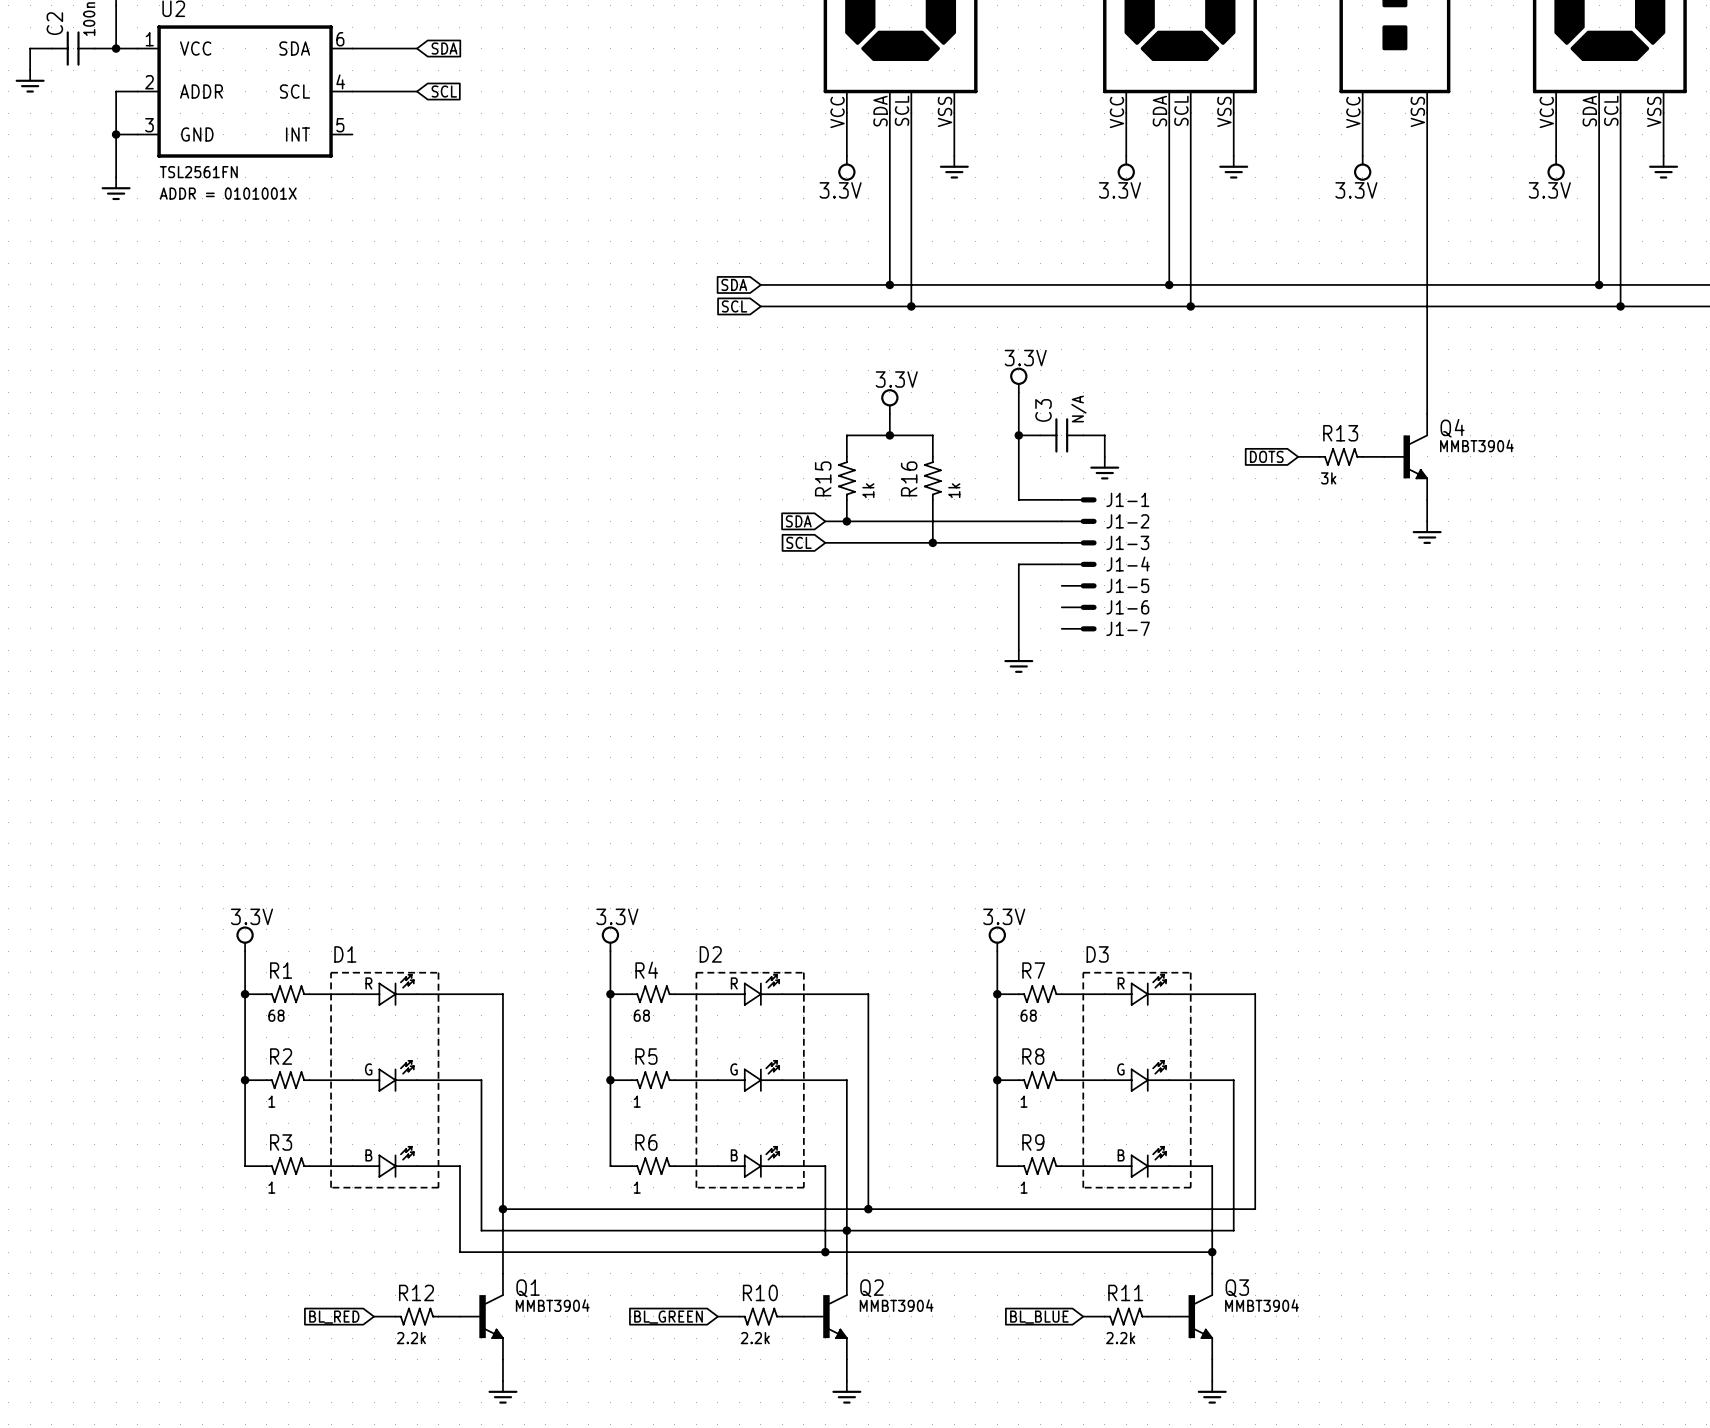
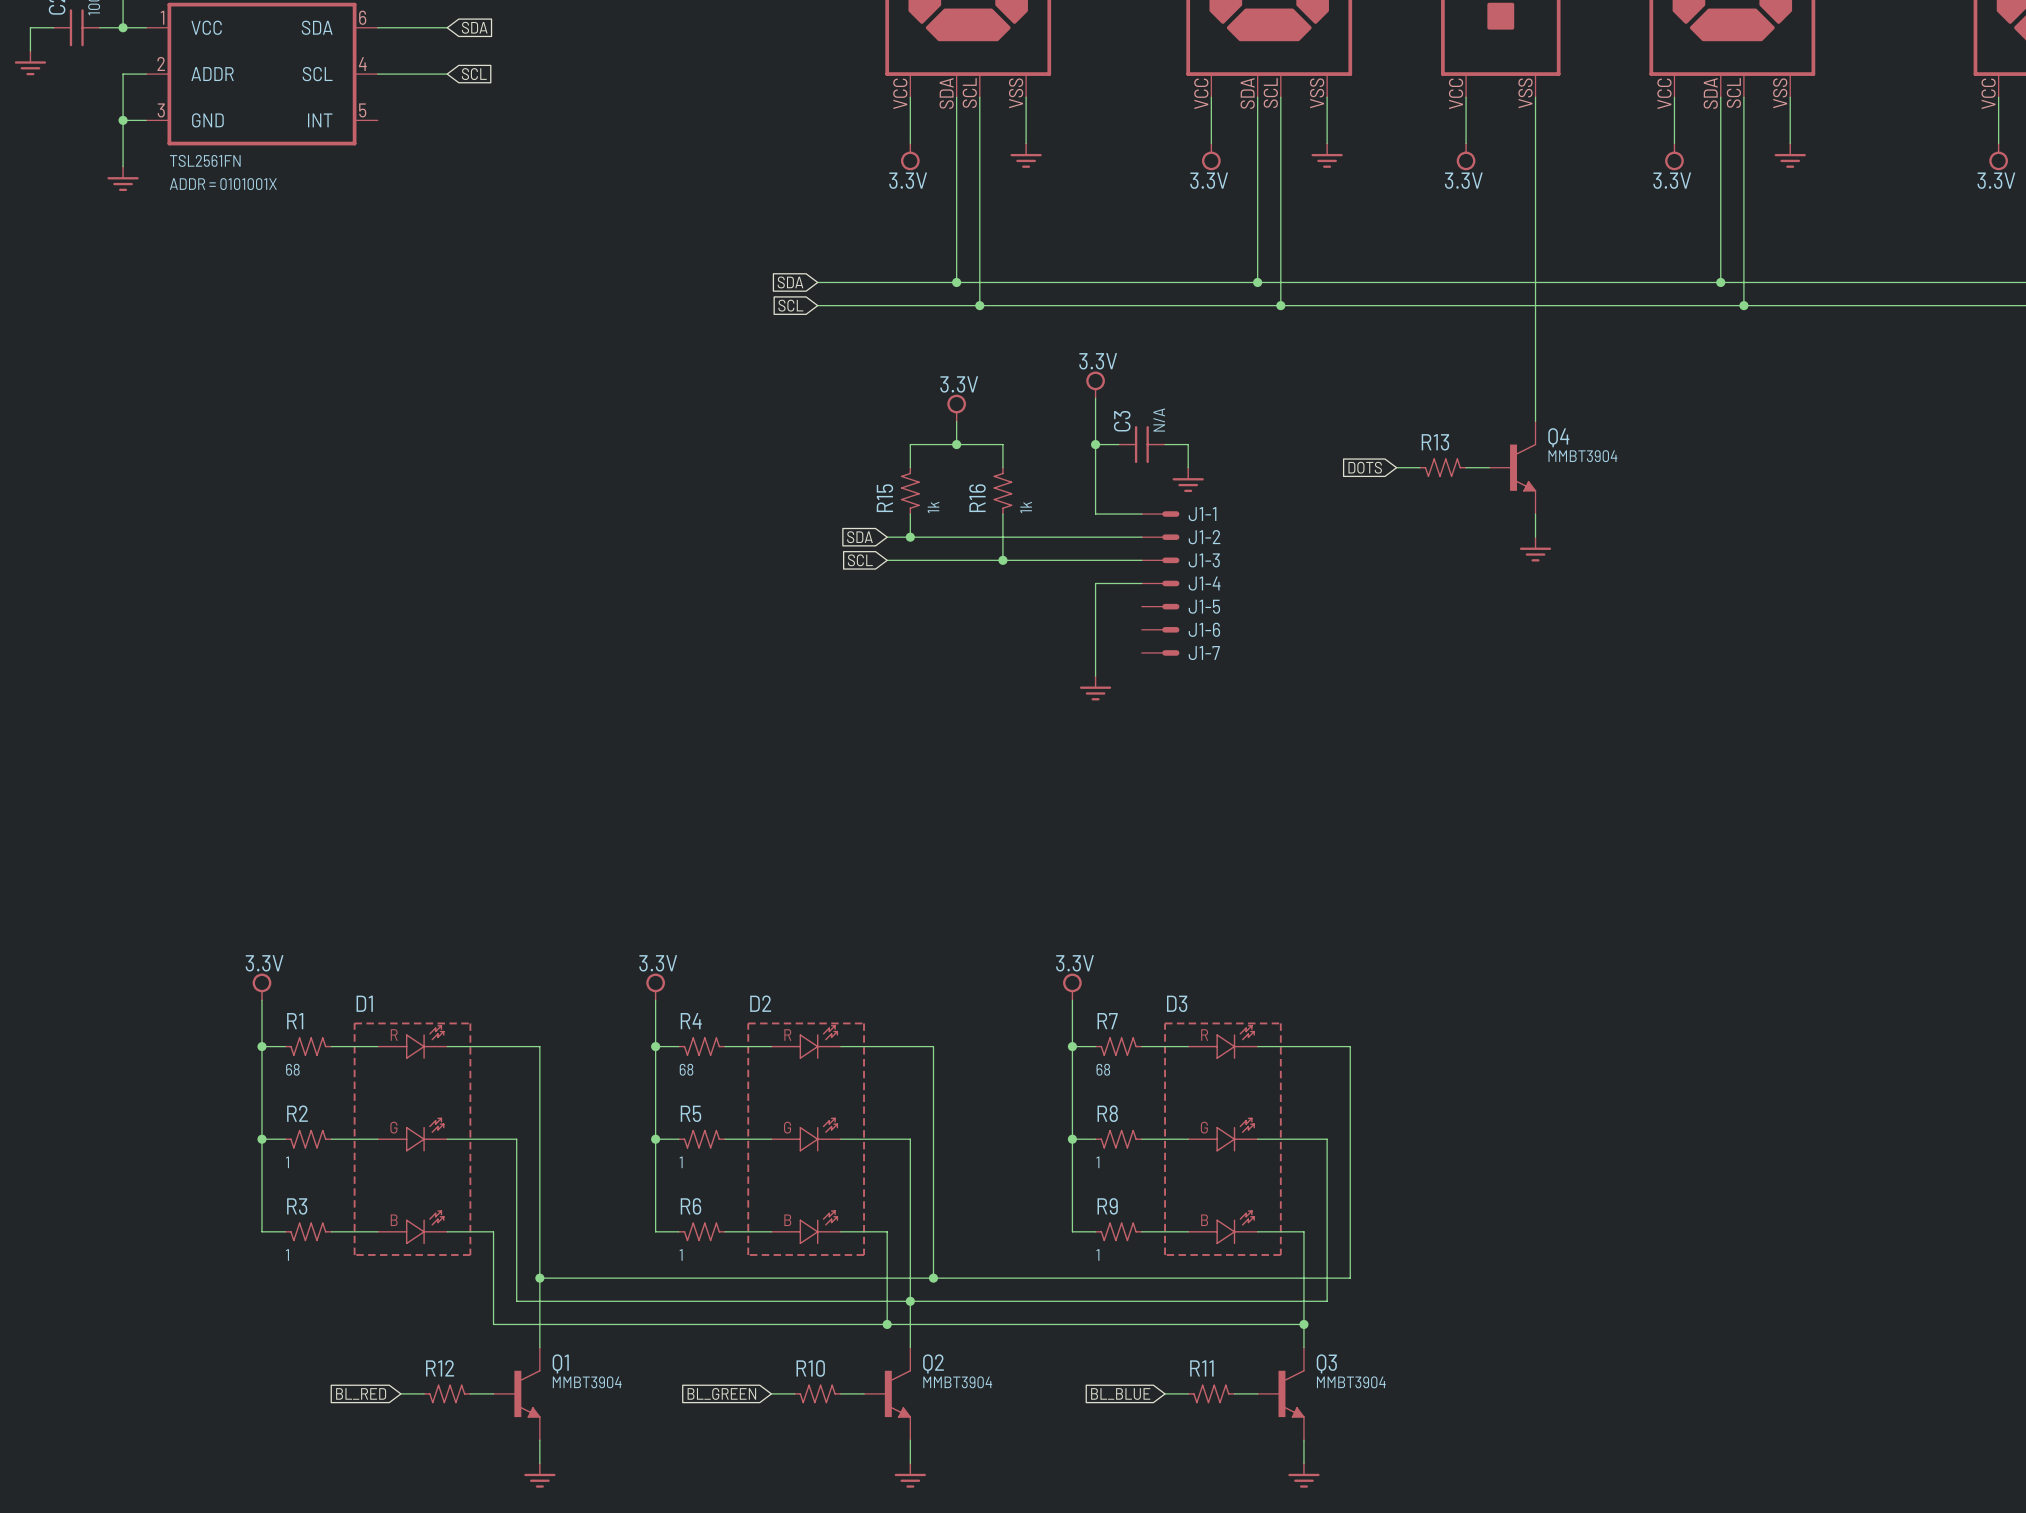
R13 value: 3k (1328, 478) -> none
R12 value: 2.2k (411, 1338) -> none
R10 value: 2.2k (755, 1338) -> none
R11 value: 2.2k (1120, 1338) -> none

